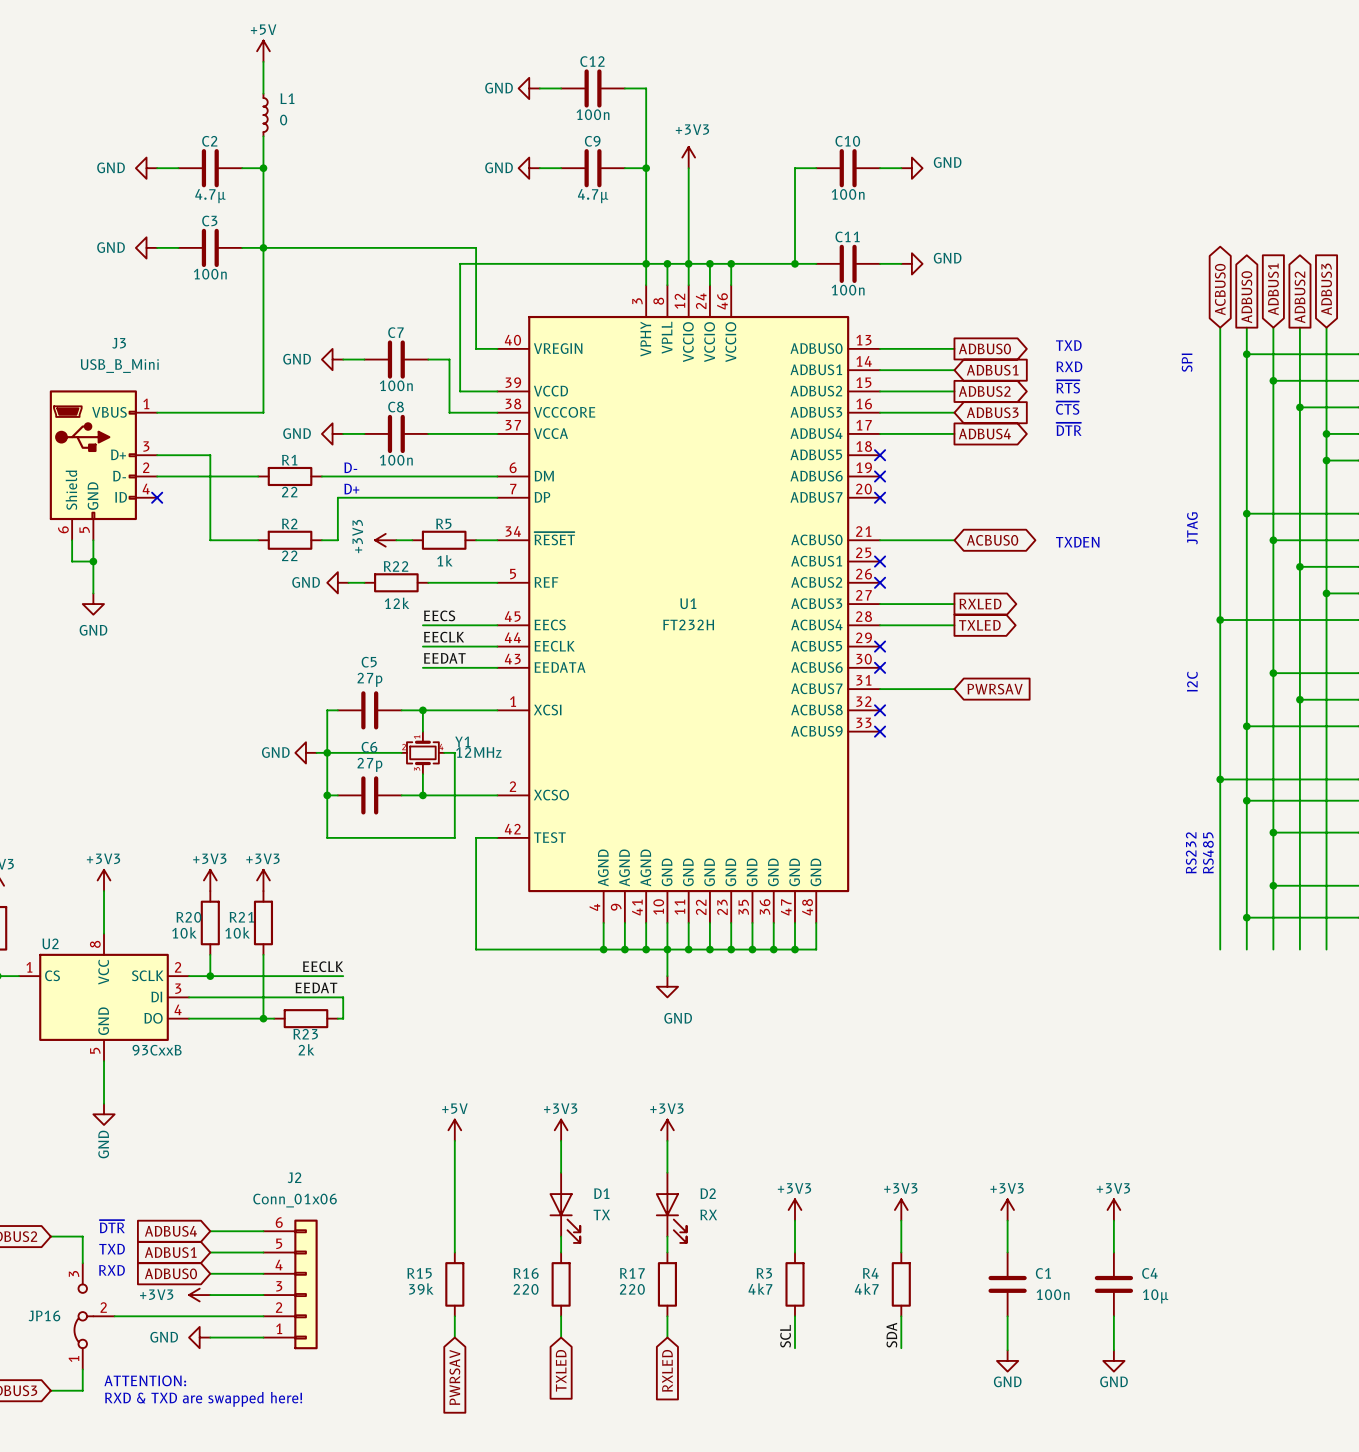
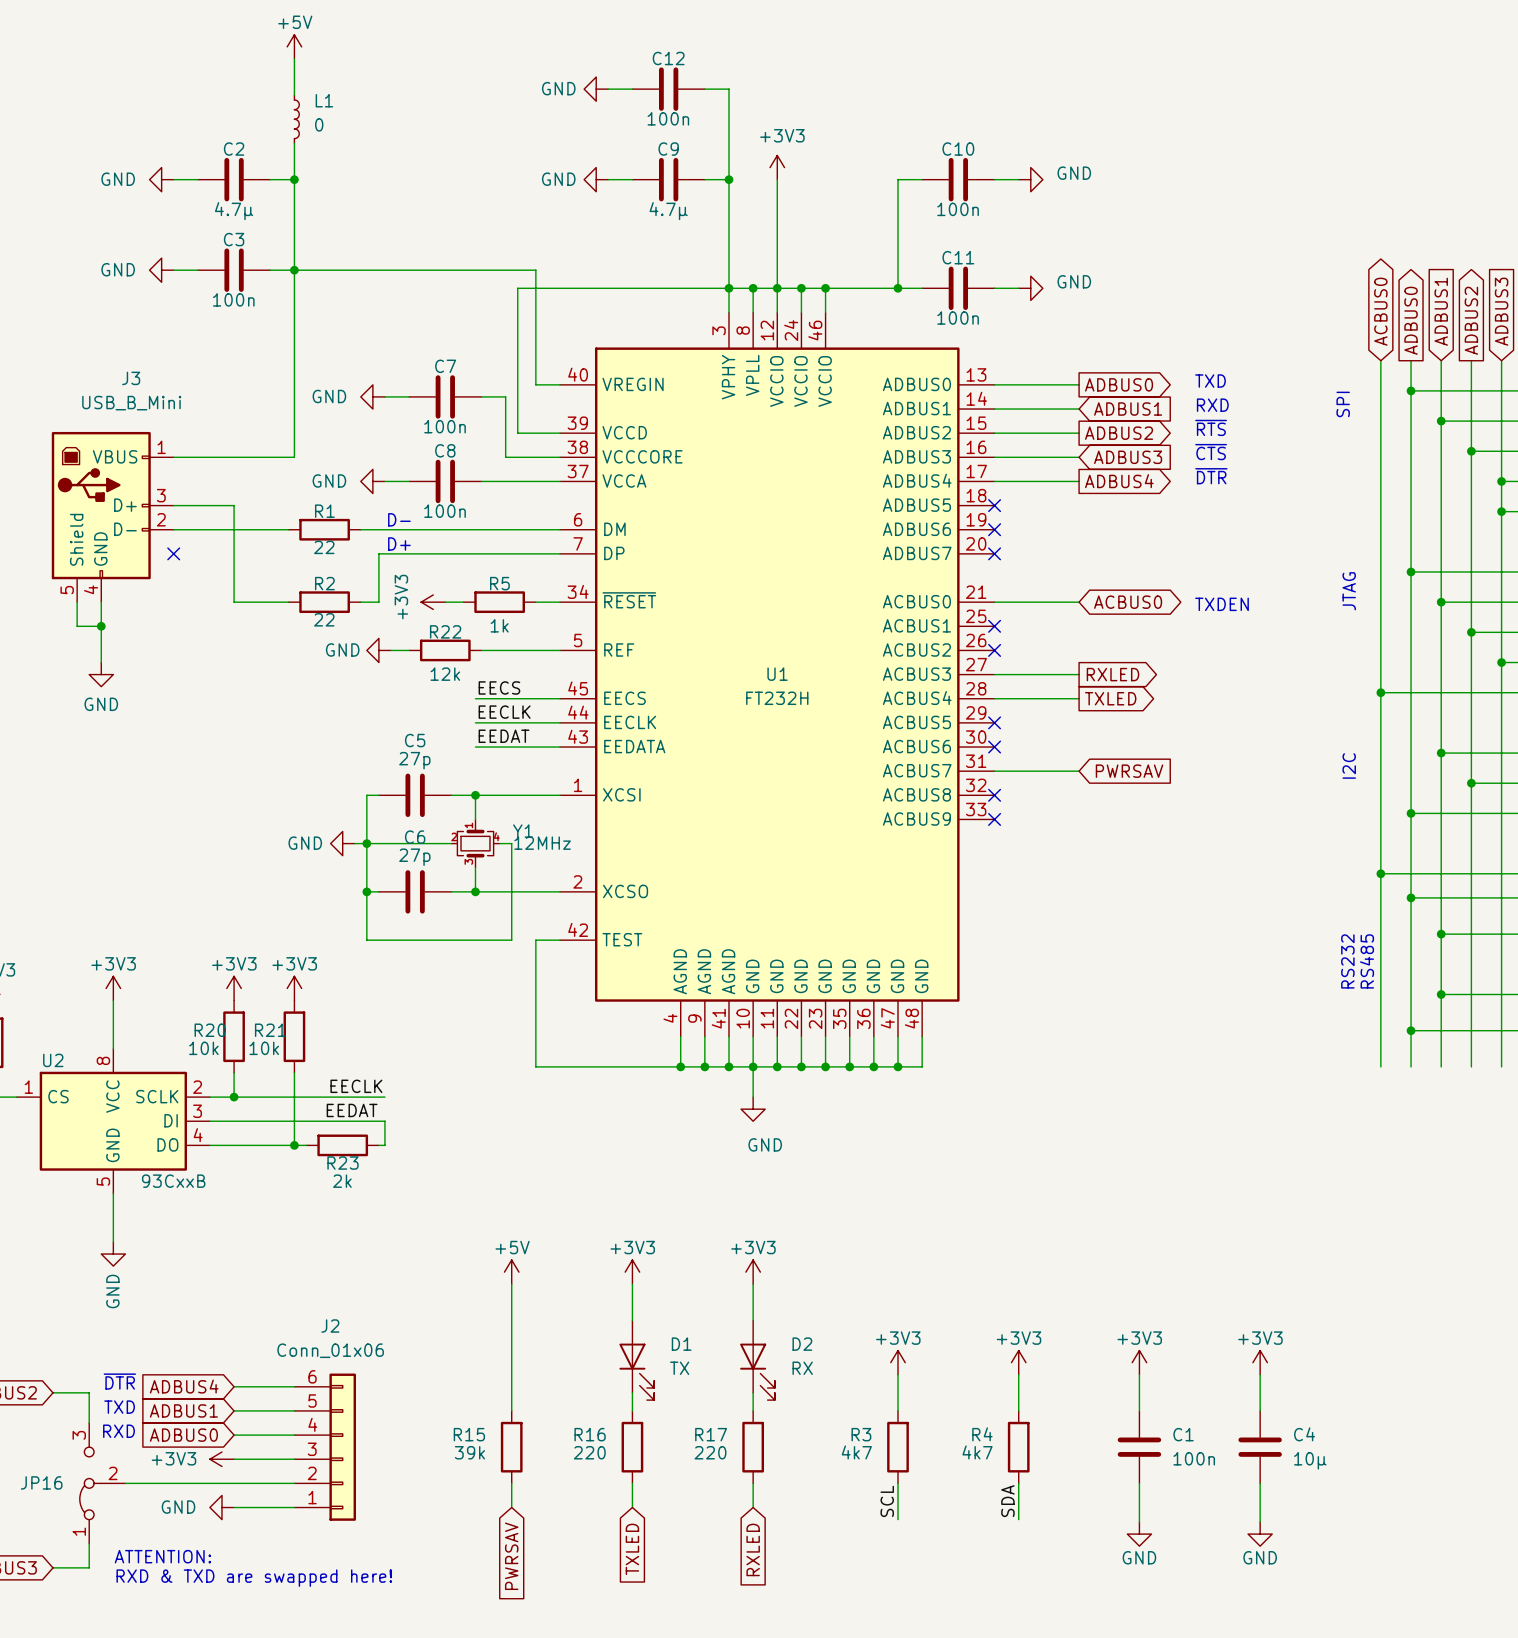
J3 symbol: [49, 390, 158, 541] -> [51, 431, 174, 603]

